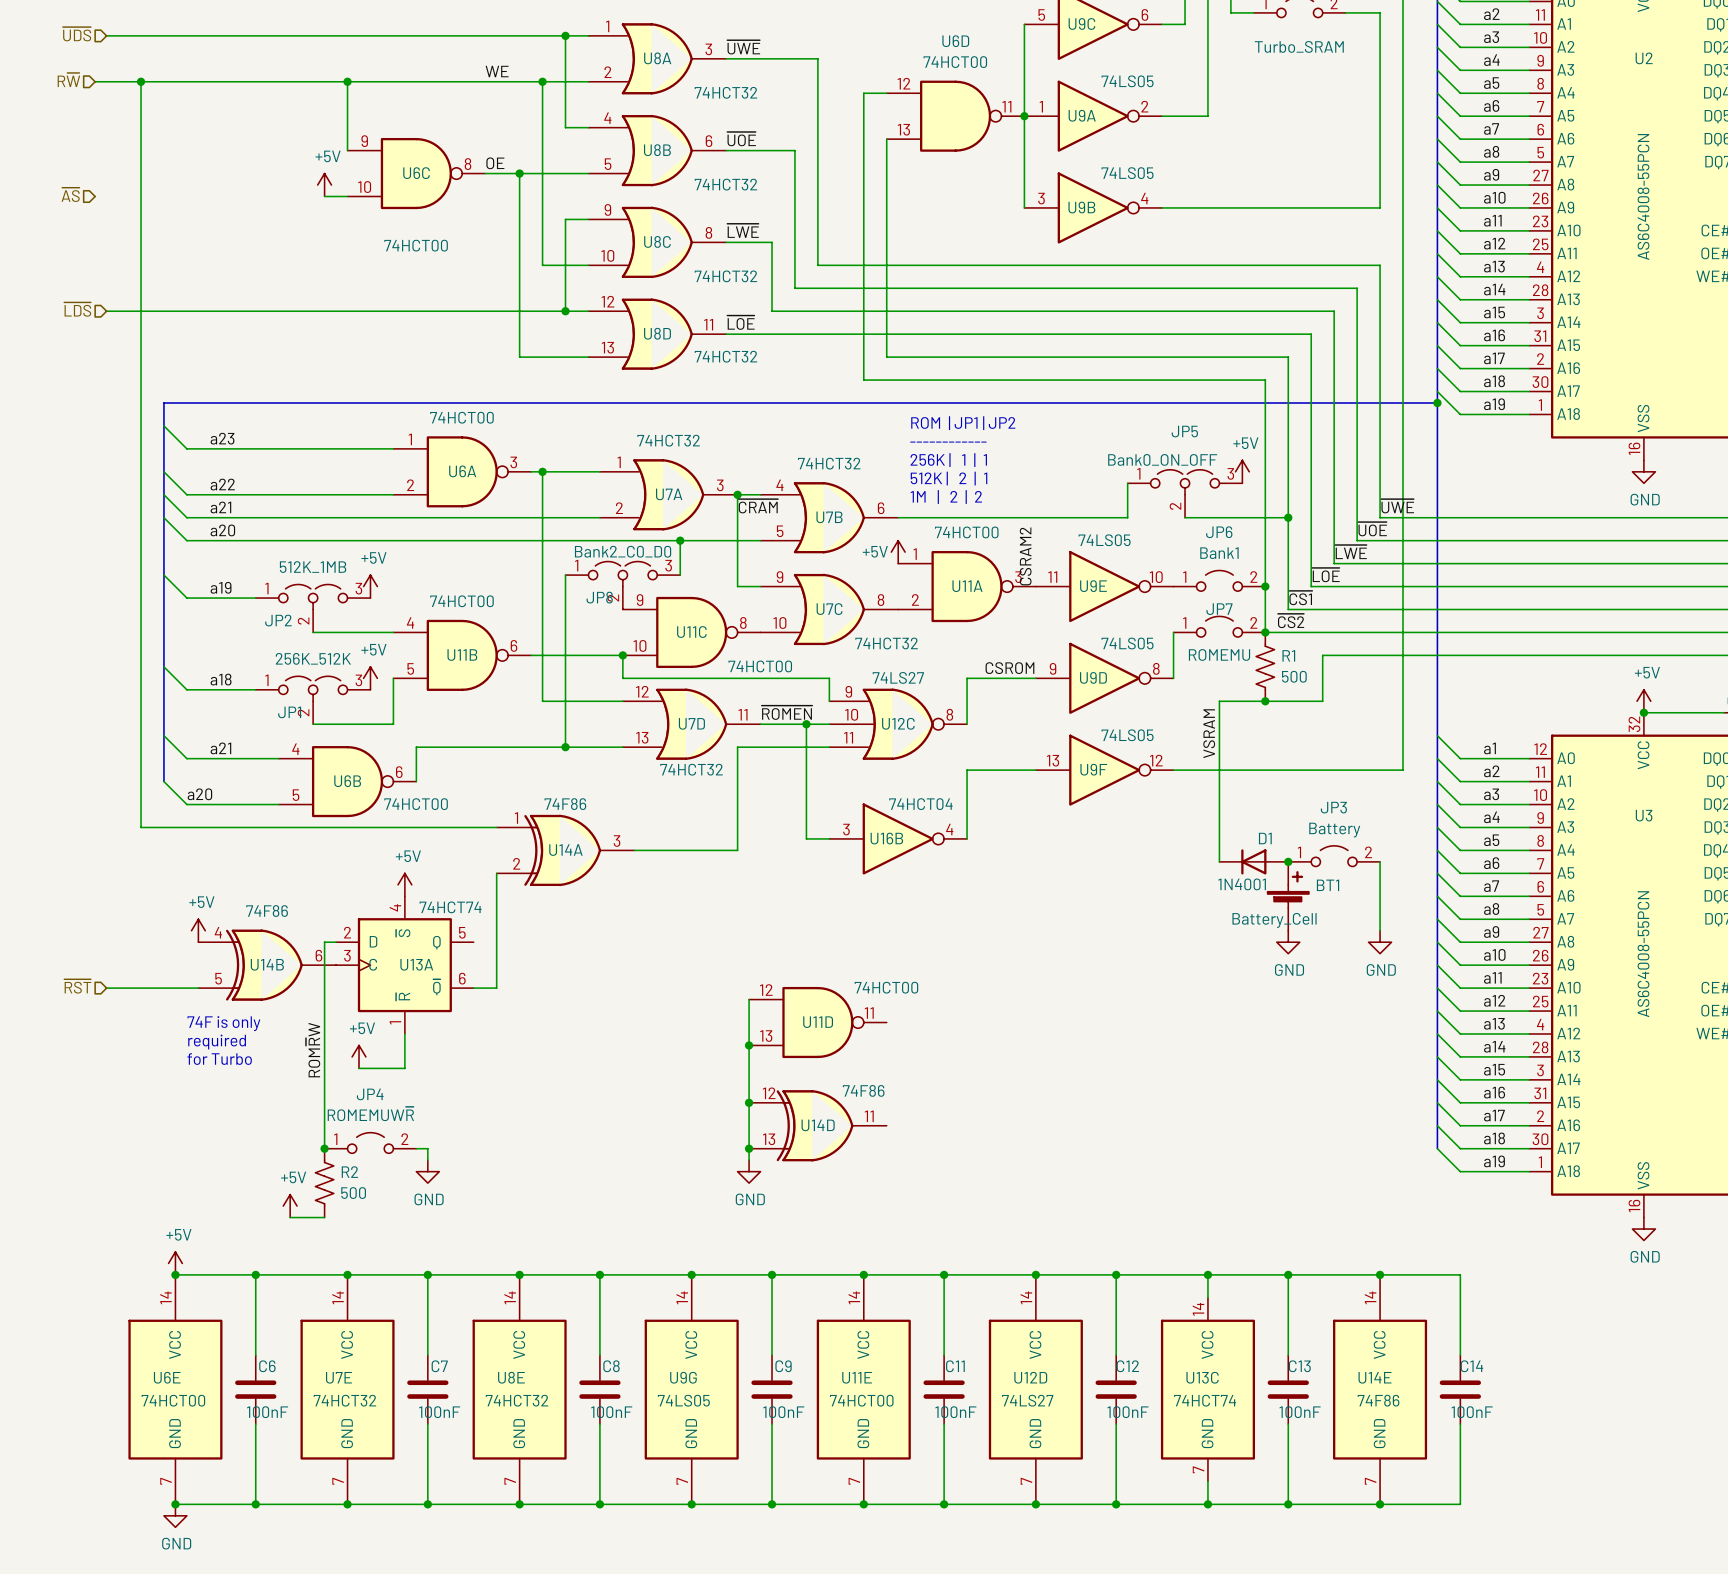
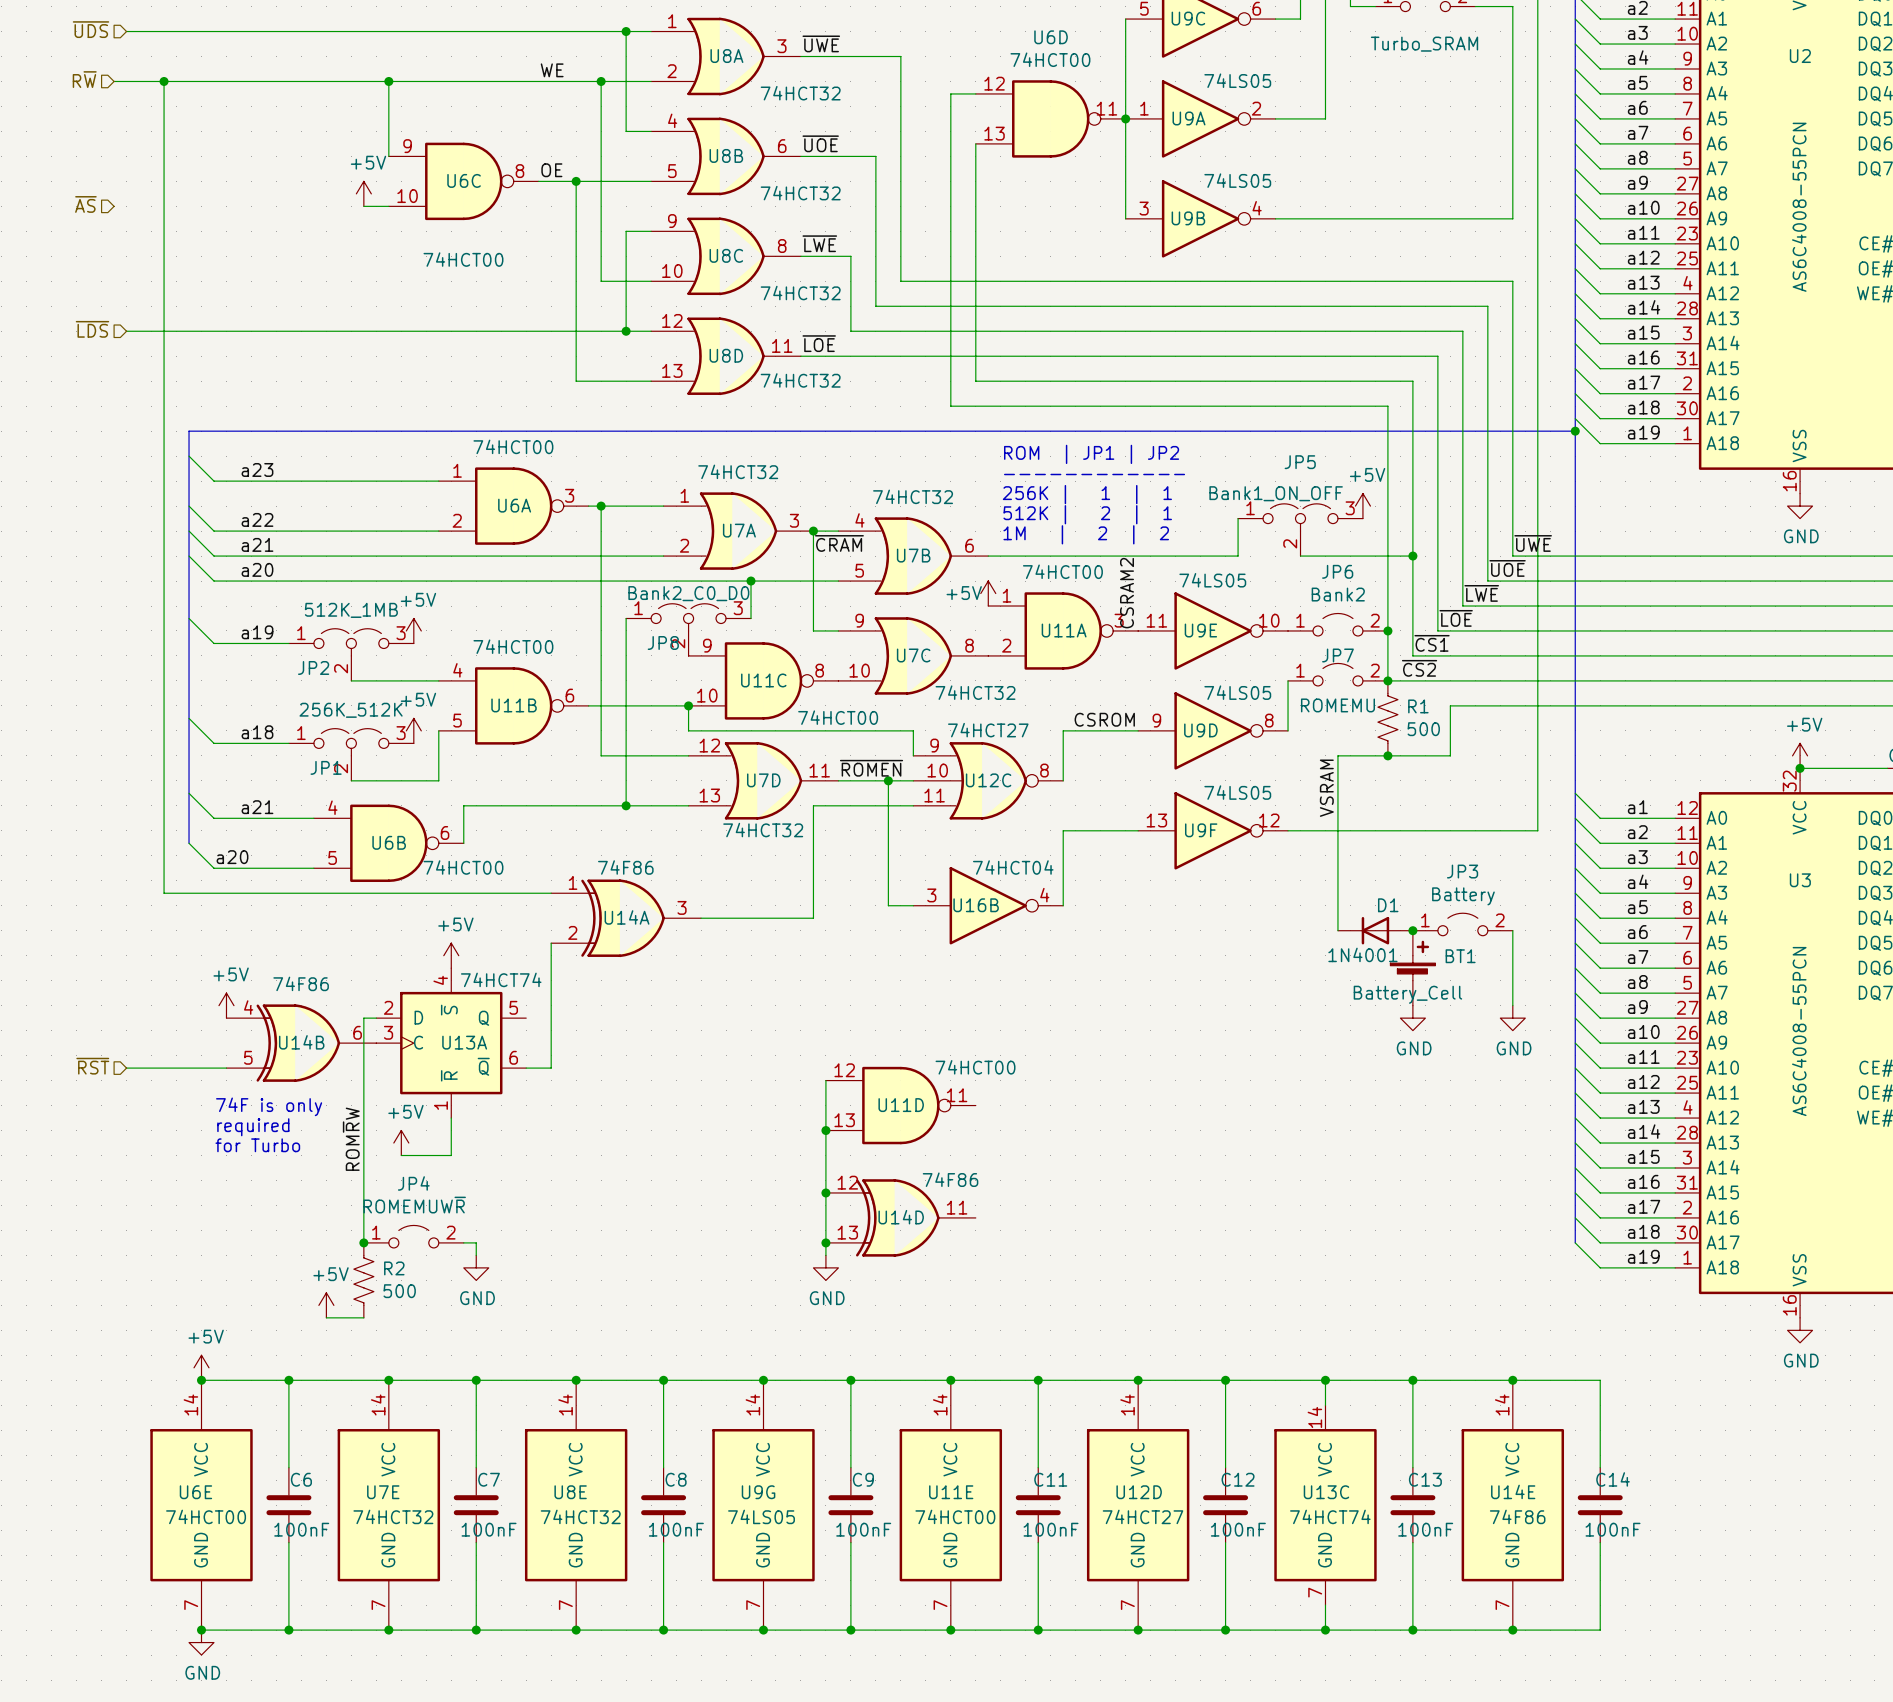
JP5 value: Bank0_ON_OFF (1162, 459) -> Bank1_ON_OFF (1276, 493)
JP6 value: Bank1 (1219, 553) -> Bank2 (1338, 594)
U12C value: 74LS27 (898, 677) -> 74HCT27 (988, 730)
U12D value: 74LS27 (1027, 1400) -> 74HCT27 (1143, 1516)

